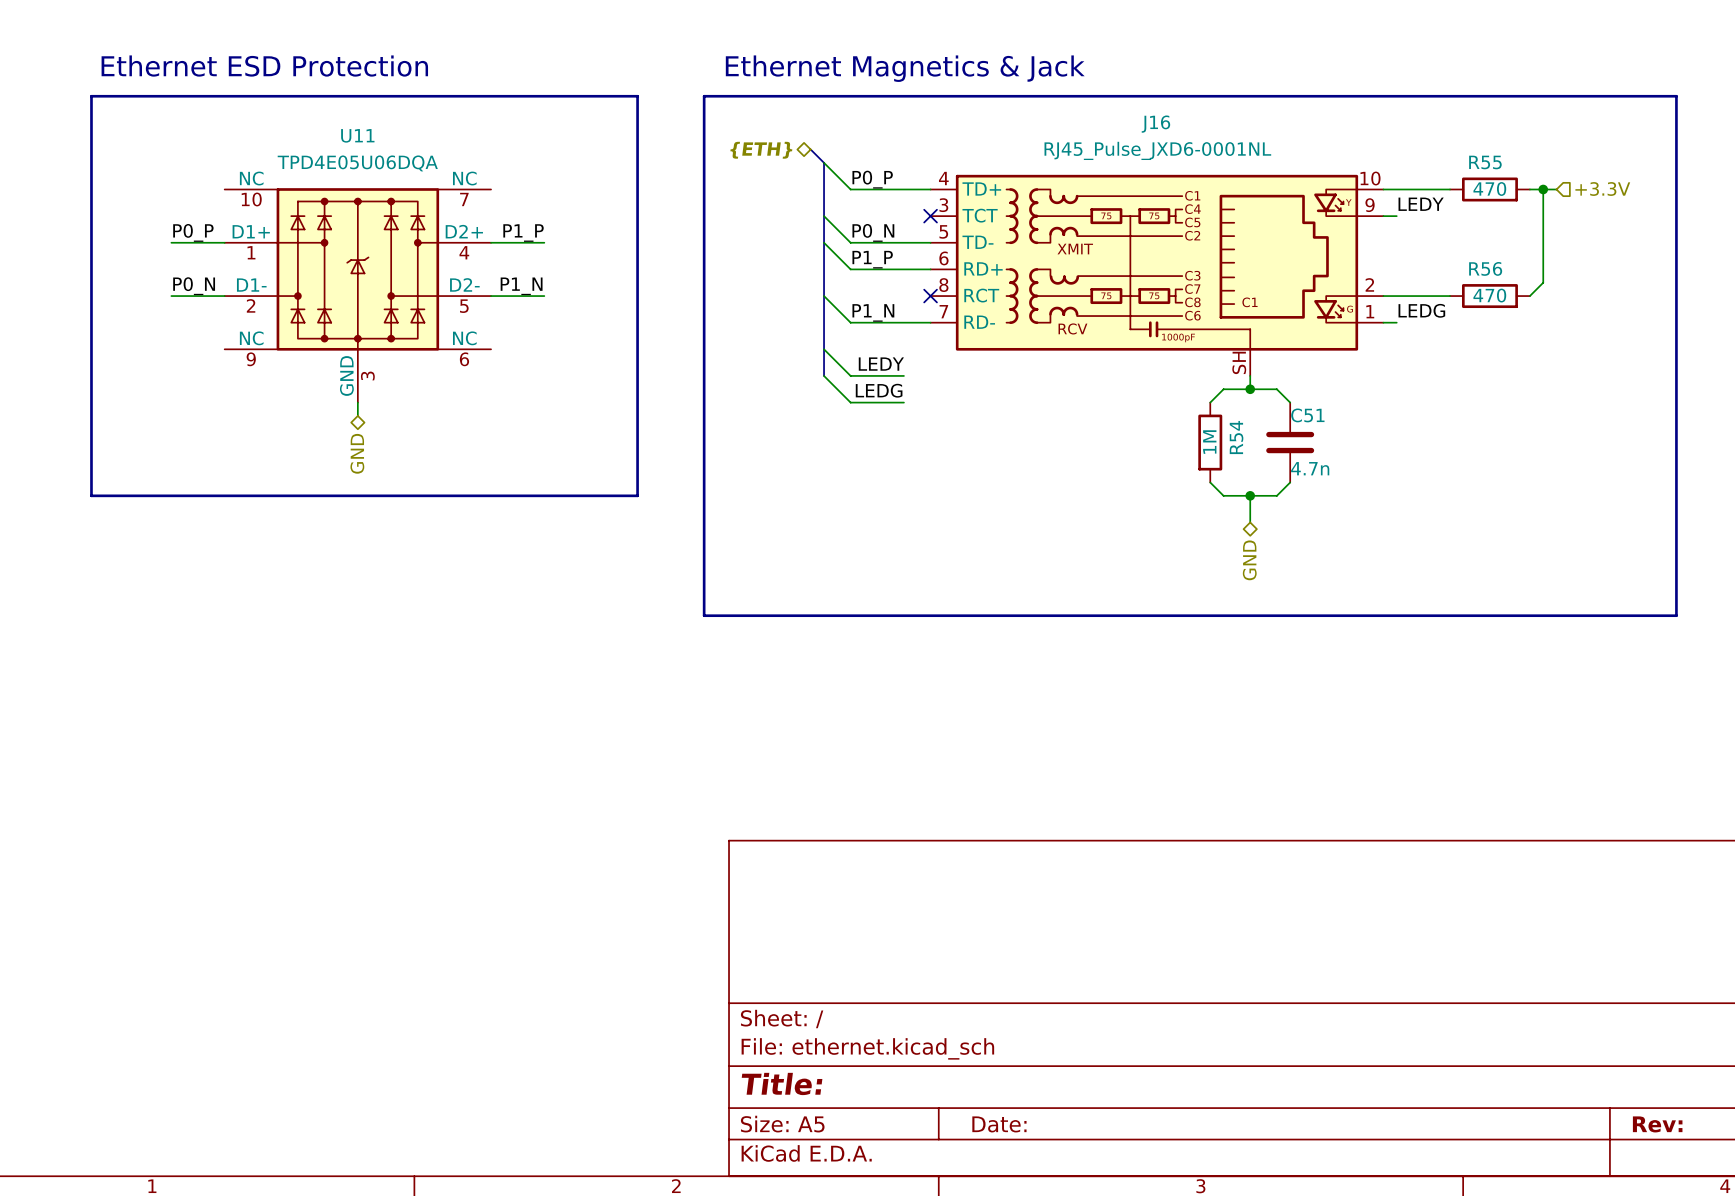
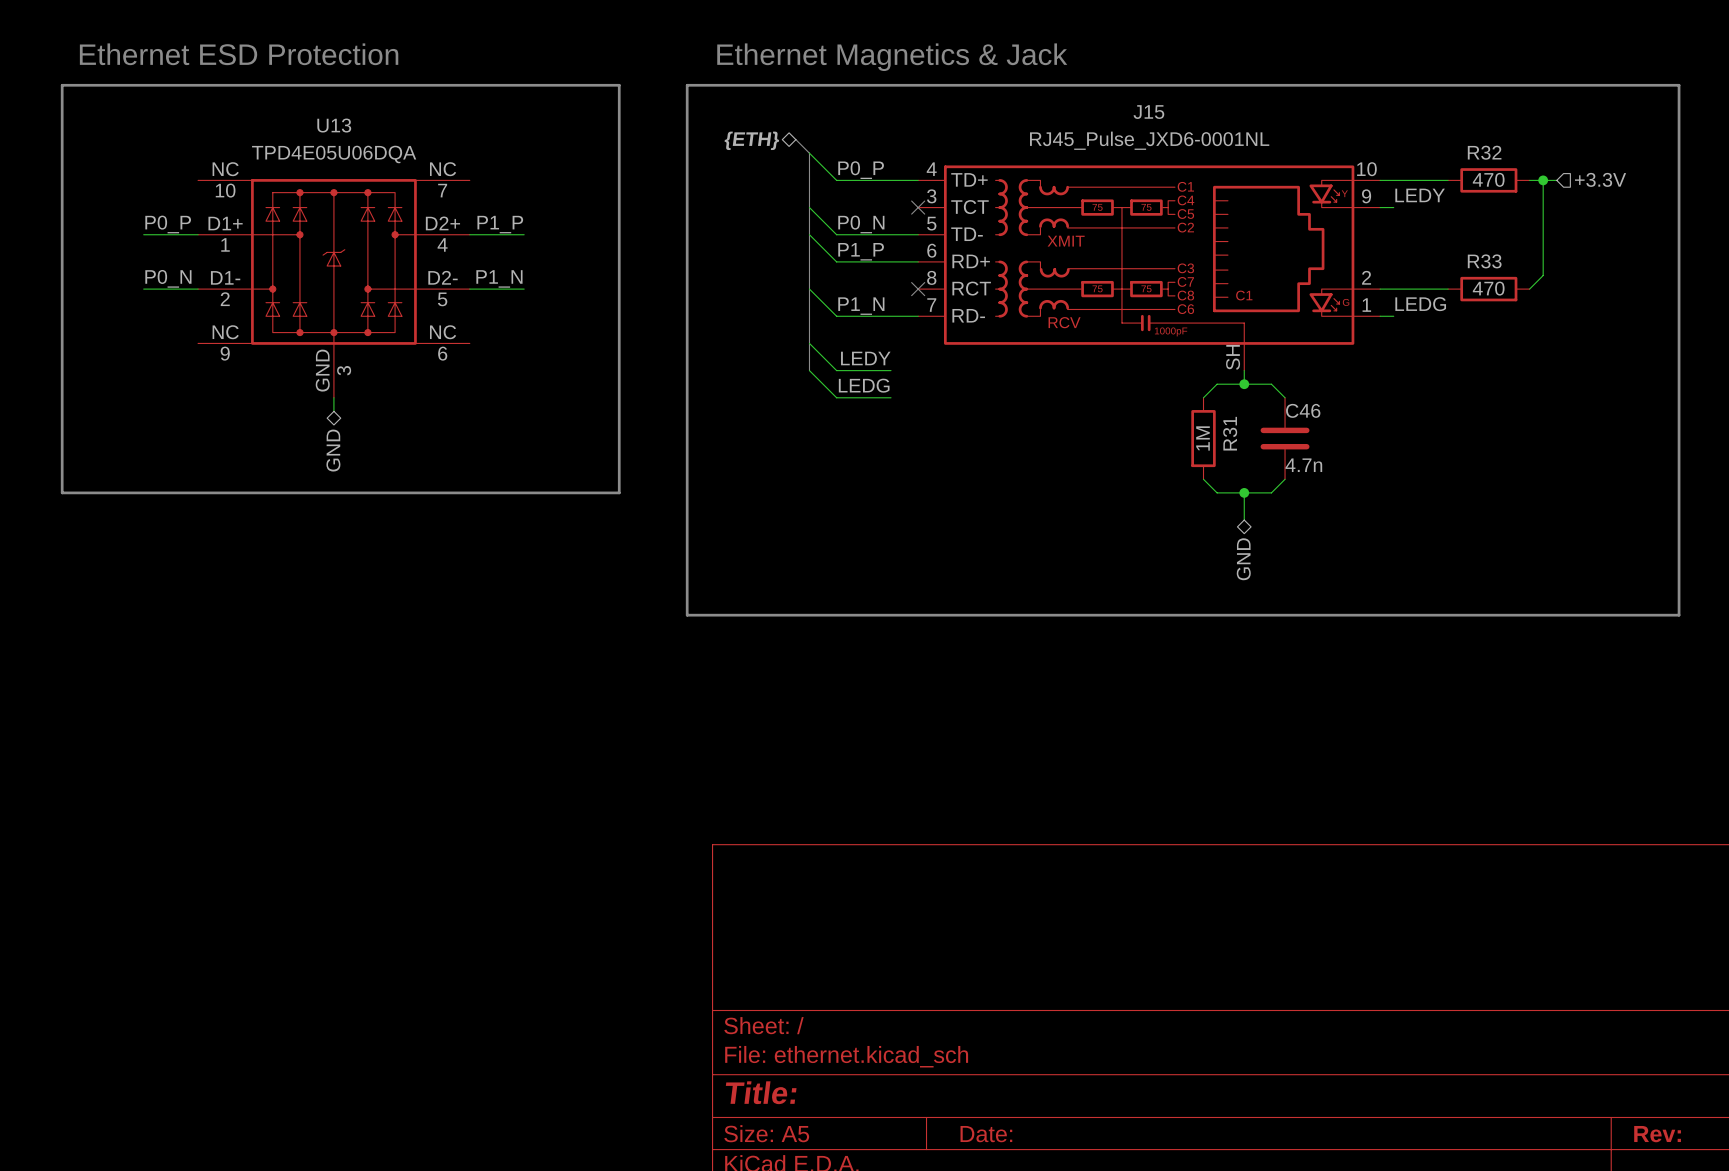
J16 name: J16 (1155, 124) -> J15 (1148, 112)
U11 name: U11 (357, 135) -> U13 (334, 125)
R55 name: R55 (1485, 162) -> R32 (1484, 152)
R56 name: R56 (1485, 268) -> R33 (1484, 261)
C51 name: C51 (1307, 415) -> C46 (1303, 410)
R54 name: R54 (1236, 437) -> R31 (1230, 433)

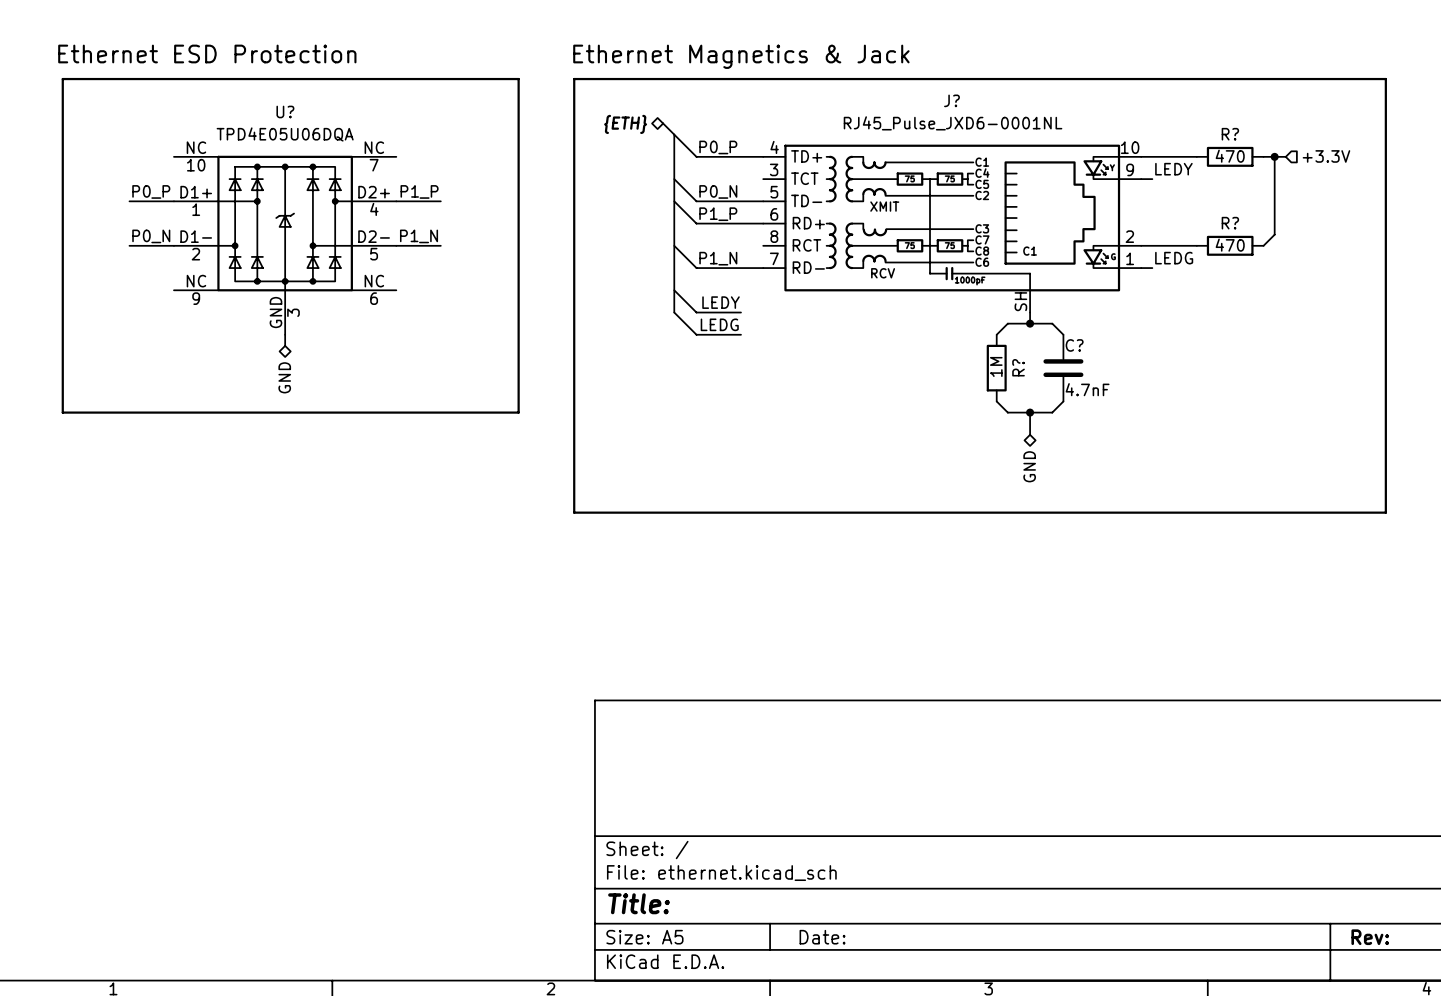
J15 name: J15 (1148, 112) -> J? (951, 100)
U13 name: U13 (334, 125) -> U? (285, 111)
R32 name: R32 (1484, 152) -> R? (1230, 134)
no-connect mark: (918, 207) -> none
R33 name: R33 (1484, 261) -> R? (1230, 223)
no-connect mark: (918, 289) -> none
C46 name: C46 (1303, 410) -> C? (1074, 345)
R31 name: R31 (1230, 433) -> R? (1018, 367)
C46 value: 4.7n (1303, 465) -> 4.7nF (1087, 389)

